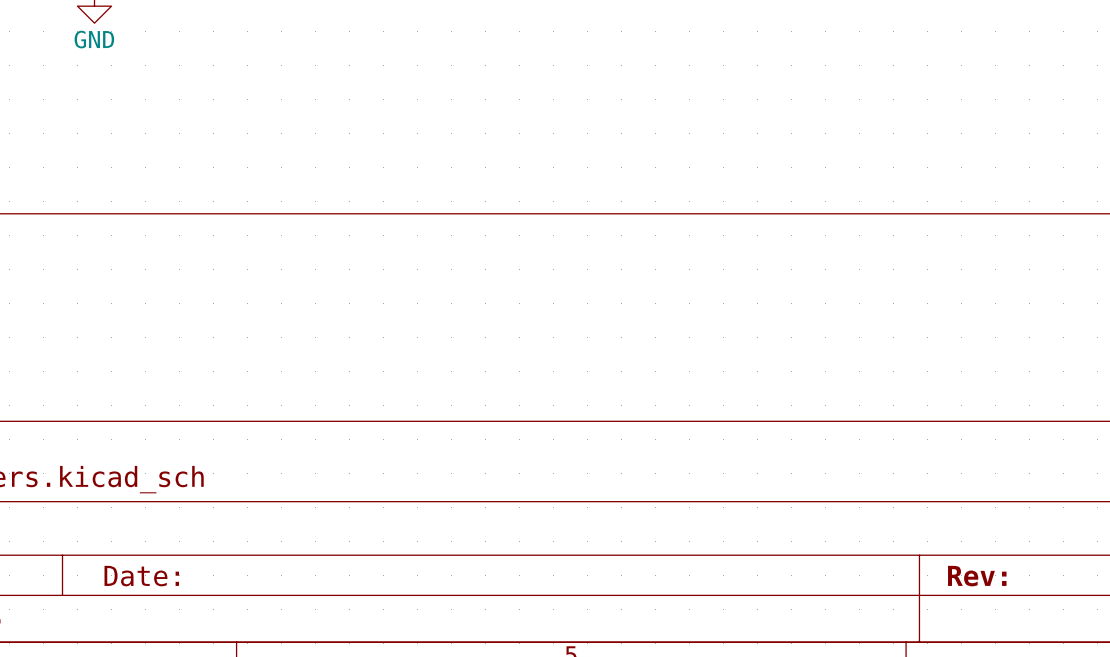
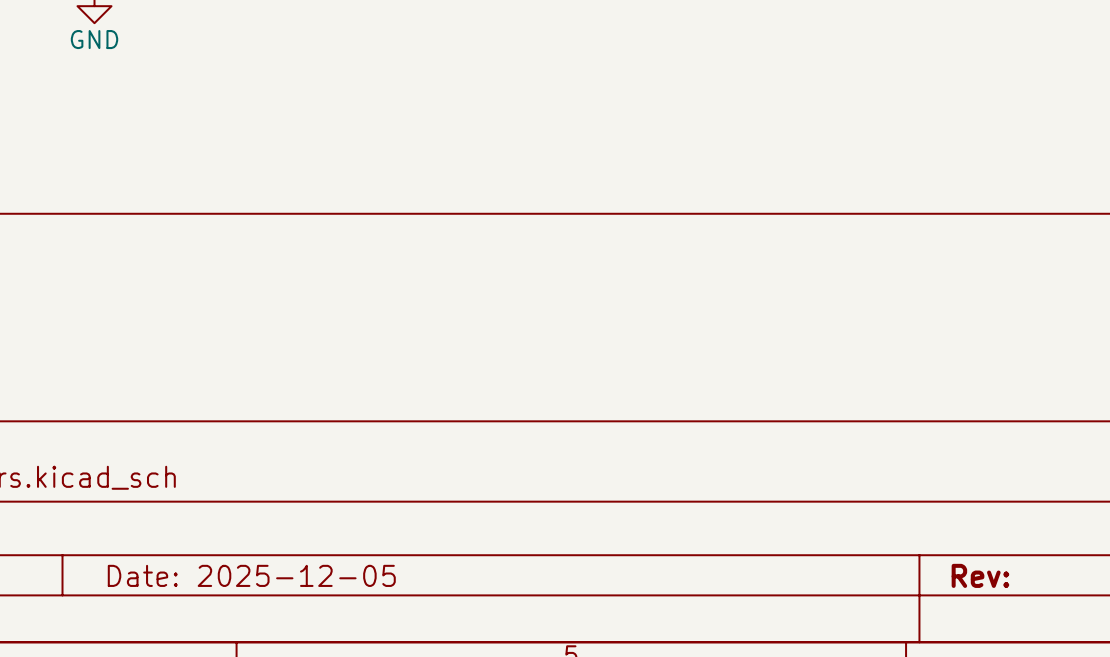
title block: Date: (141, 576) -> Date: 2025-12-05 (251, 575)

